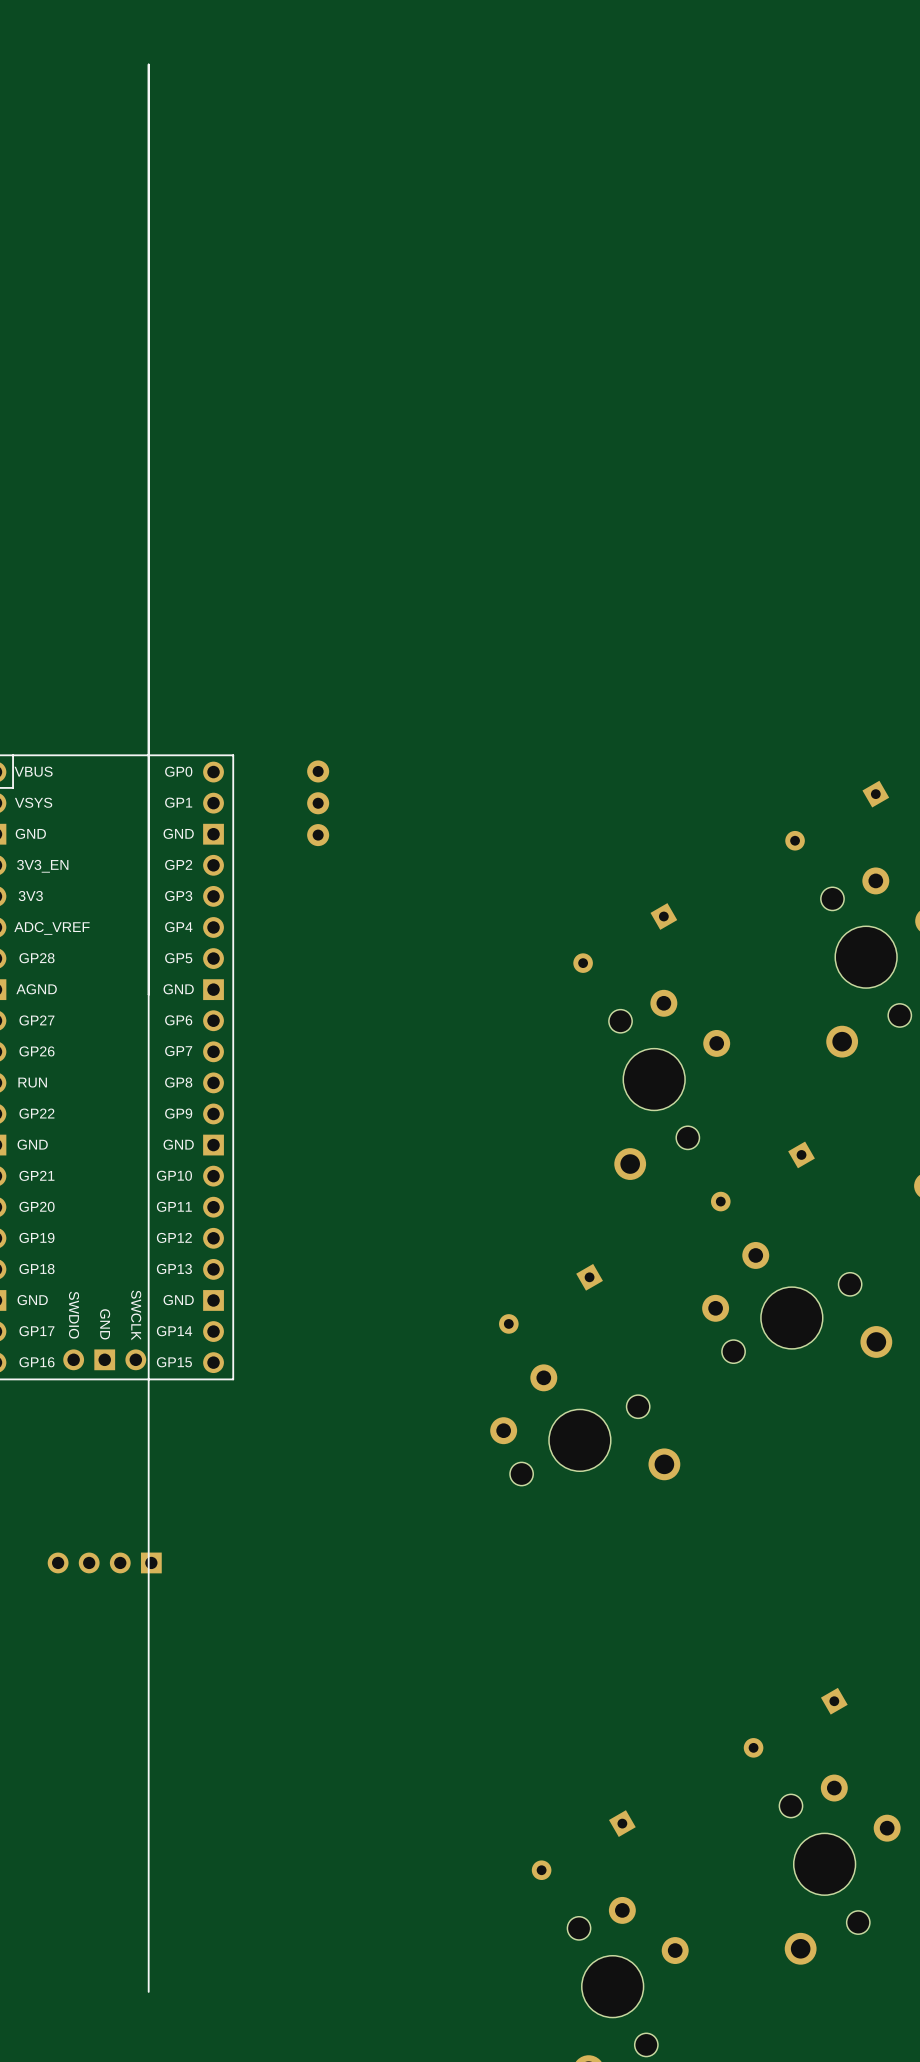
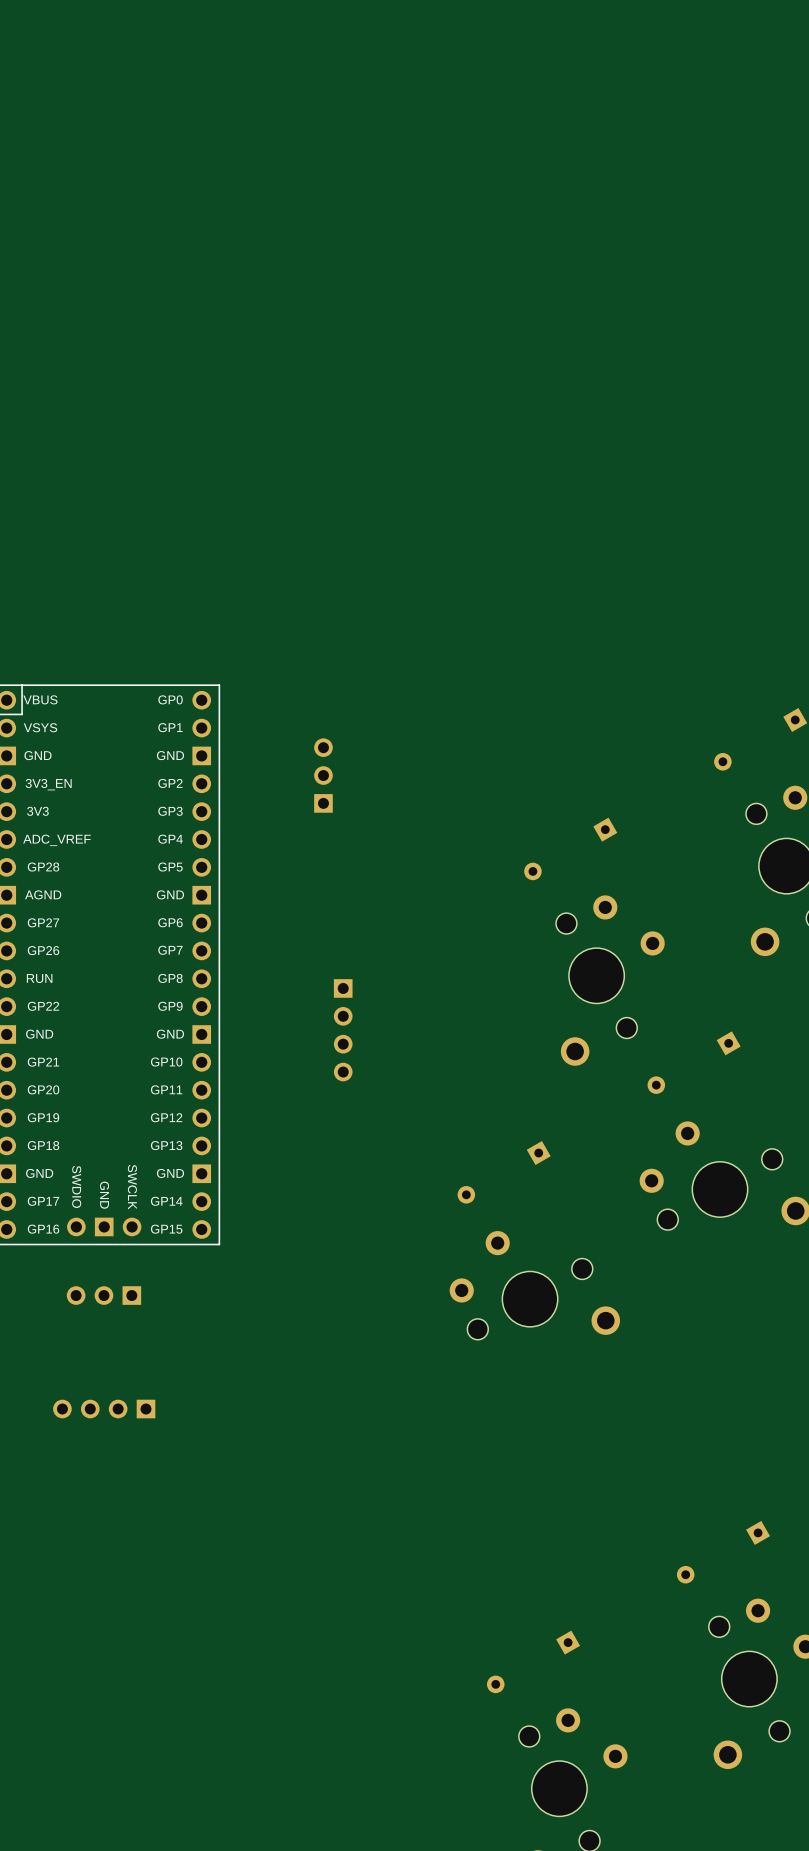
line: (148, 64) (148, 1991) -> none
part: (318, 771) -> none
part: (318, 803) -> none
part: (318, 835) -> none
part: none -> (323, 775)
part: none -> (343, 1030)
part: none -> (103, 1295)

